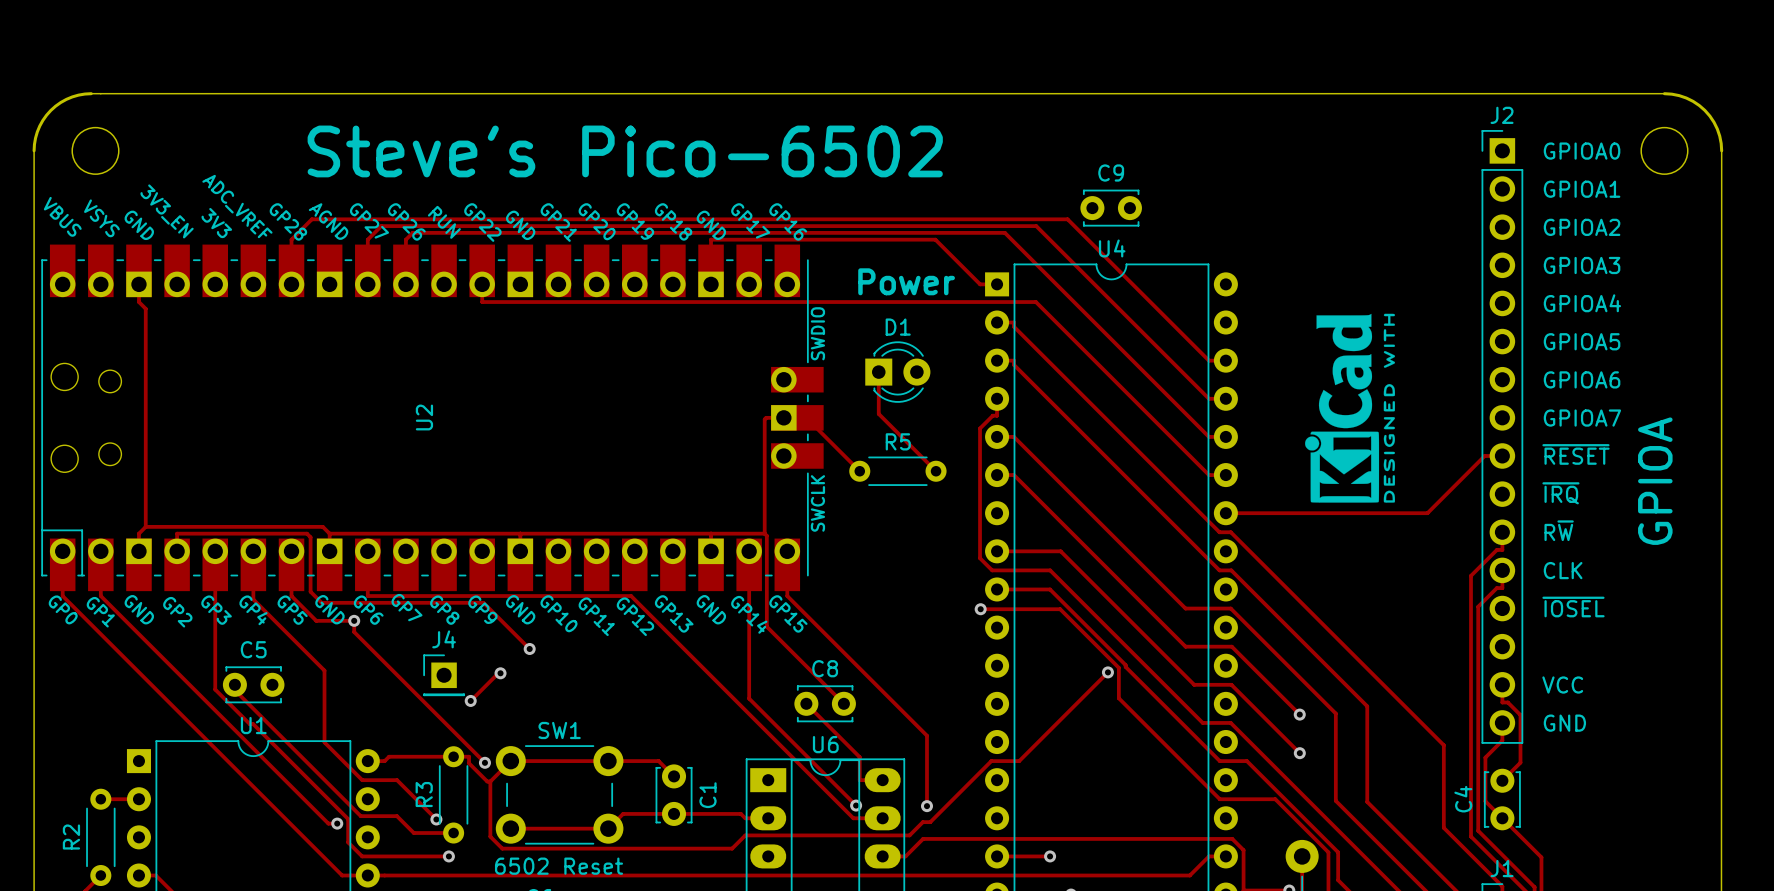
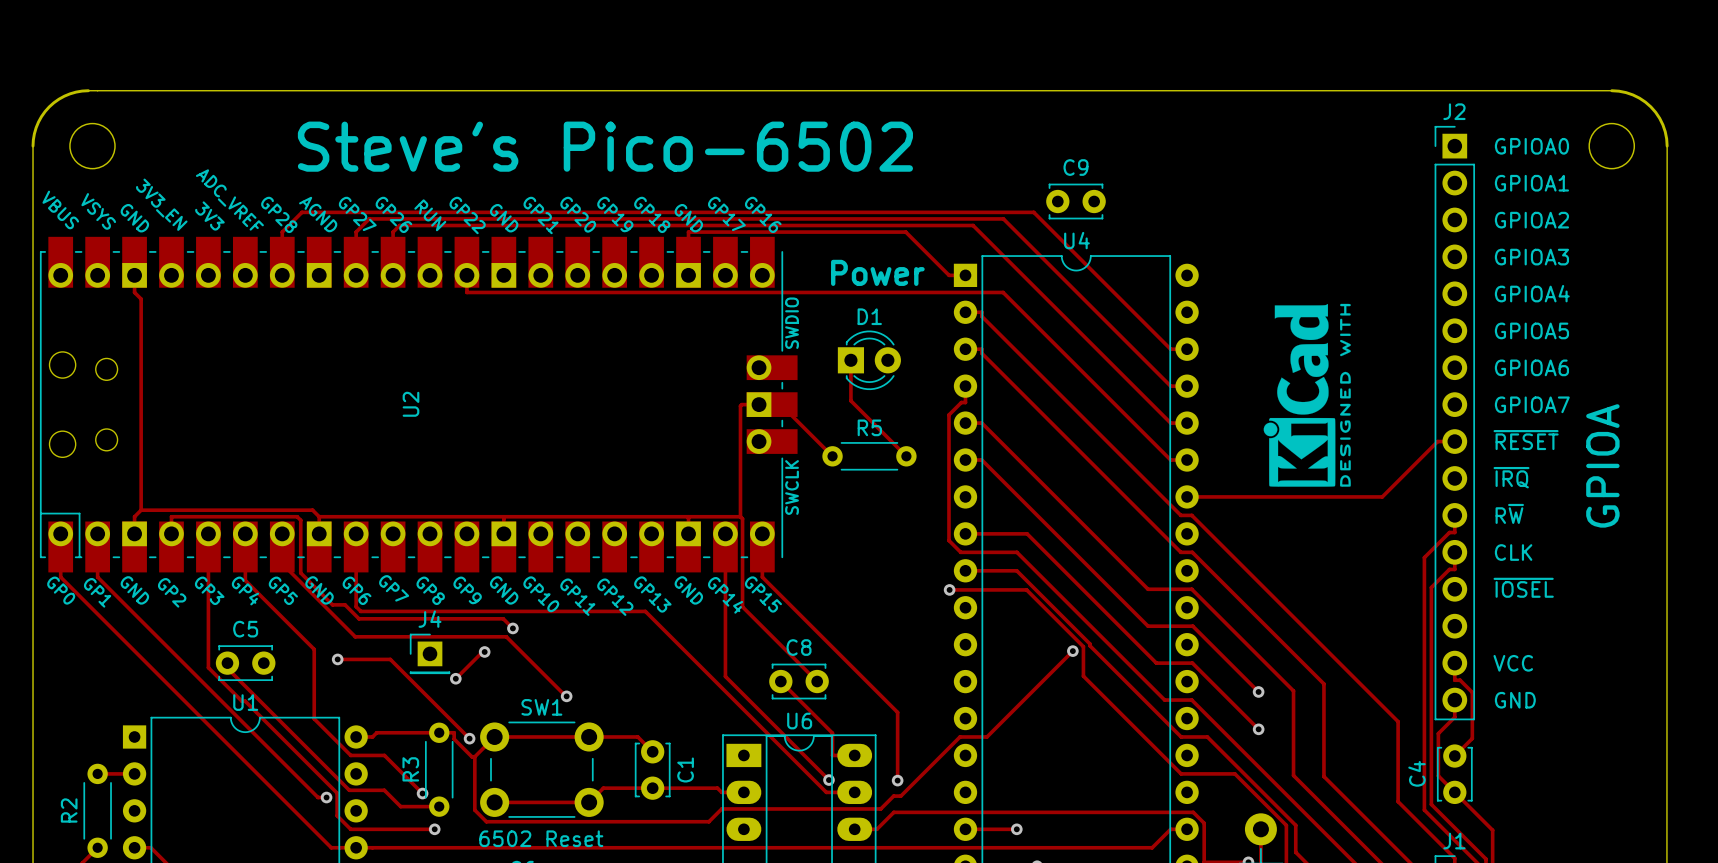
track: (291, 582) (291, 596) (316, 620) (354, 620) (354, 632) (403, 681) -> (337, 659) (390, 659)
track: none -> (282, 563) (355, 636) (506, 636) (566, 696)
track: (367, 596) (631, 596) (666, 631) -> (356, 577) (356, 606) (360, 611) (645, 611)
track: (321, 602) (483, 602) (519, 639) -> (311, 583) (332, 604) (345, 604) (359, 618) (503, 618)
via position: (354, 620) -> (337, 659)
via: none -> (566, 696)

